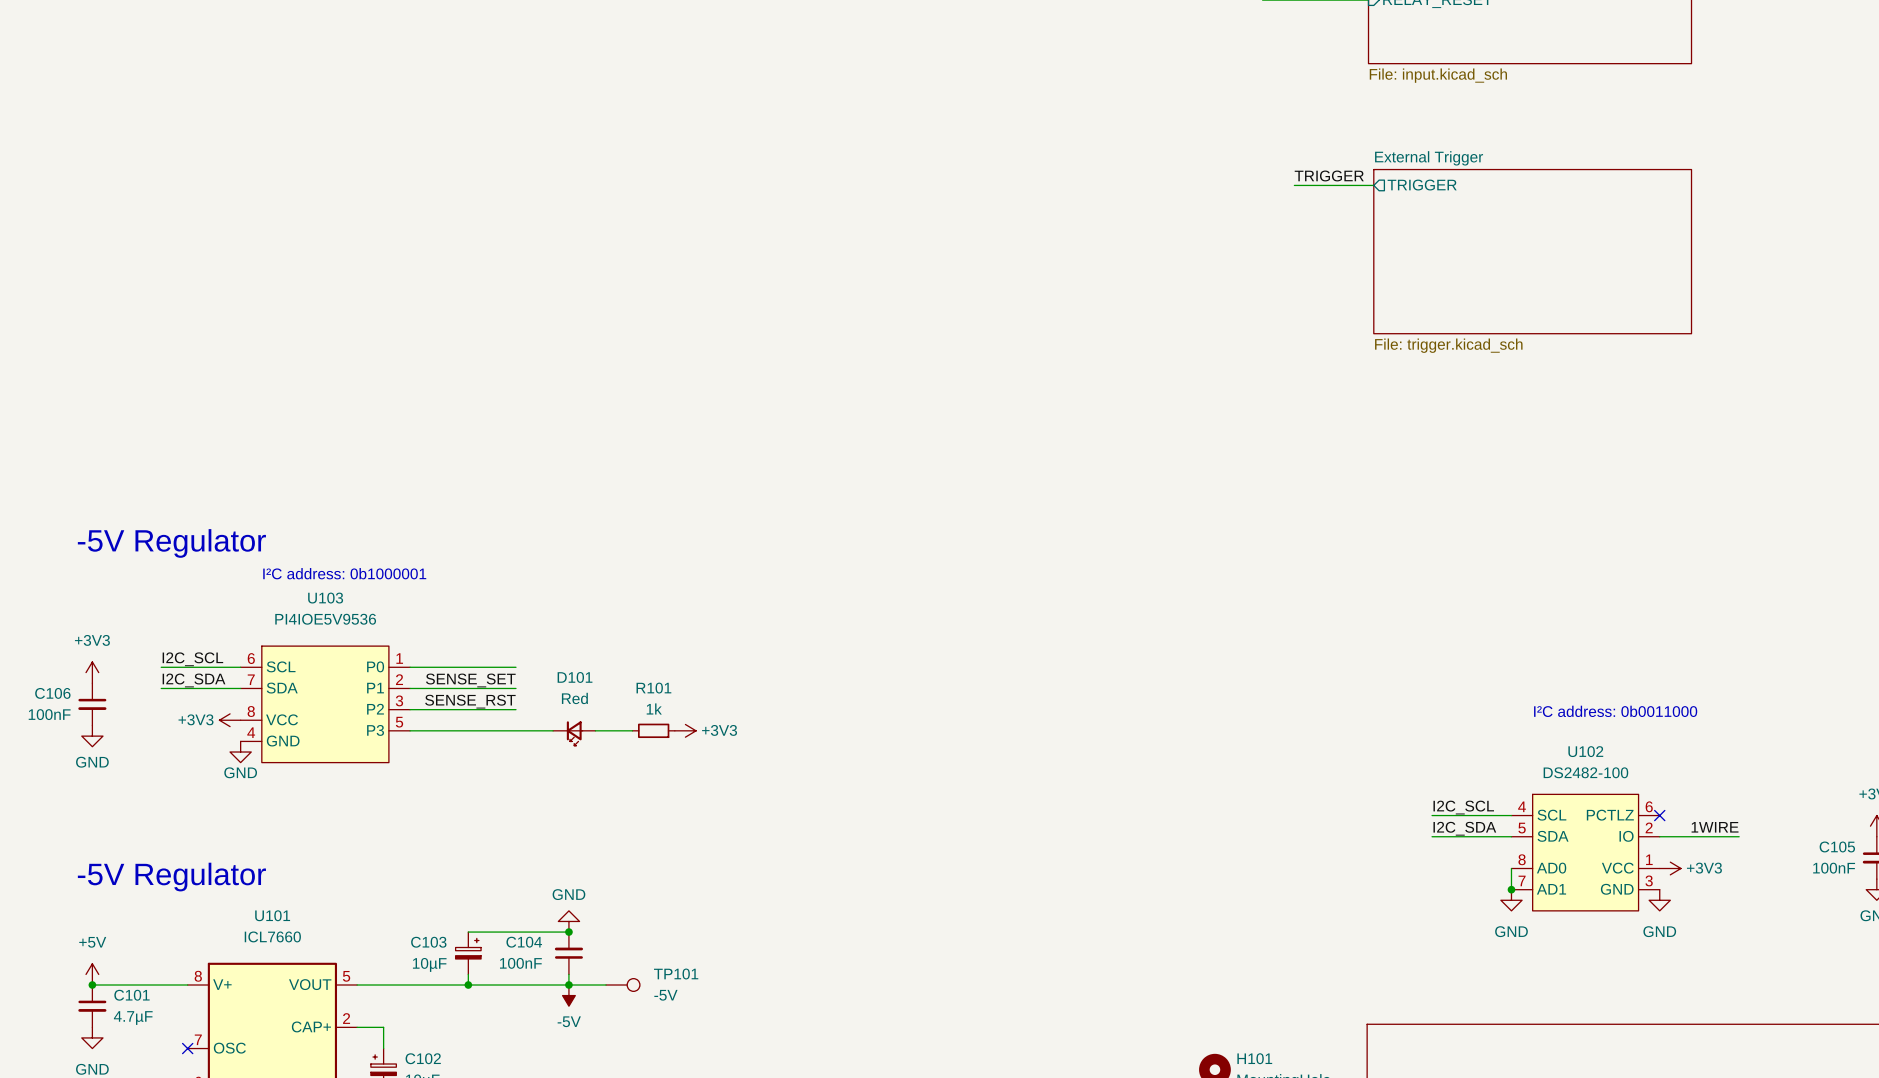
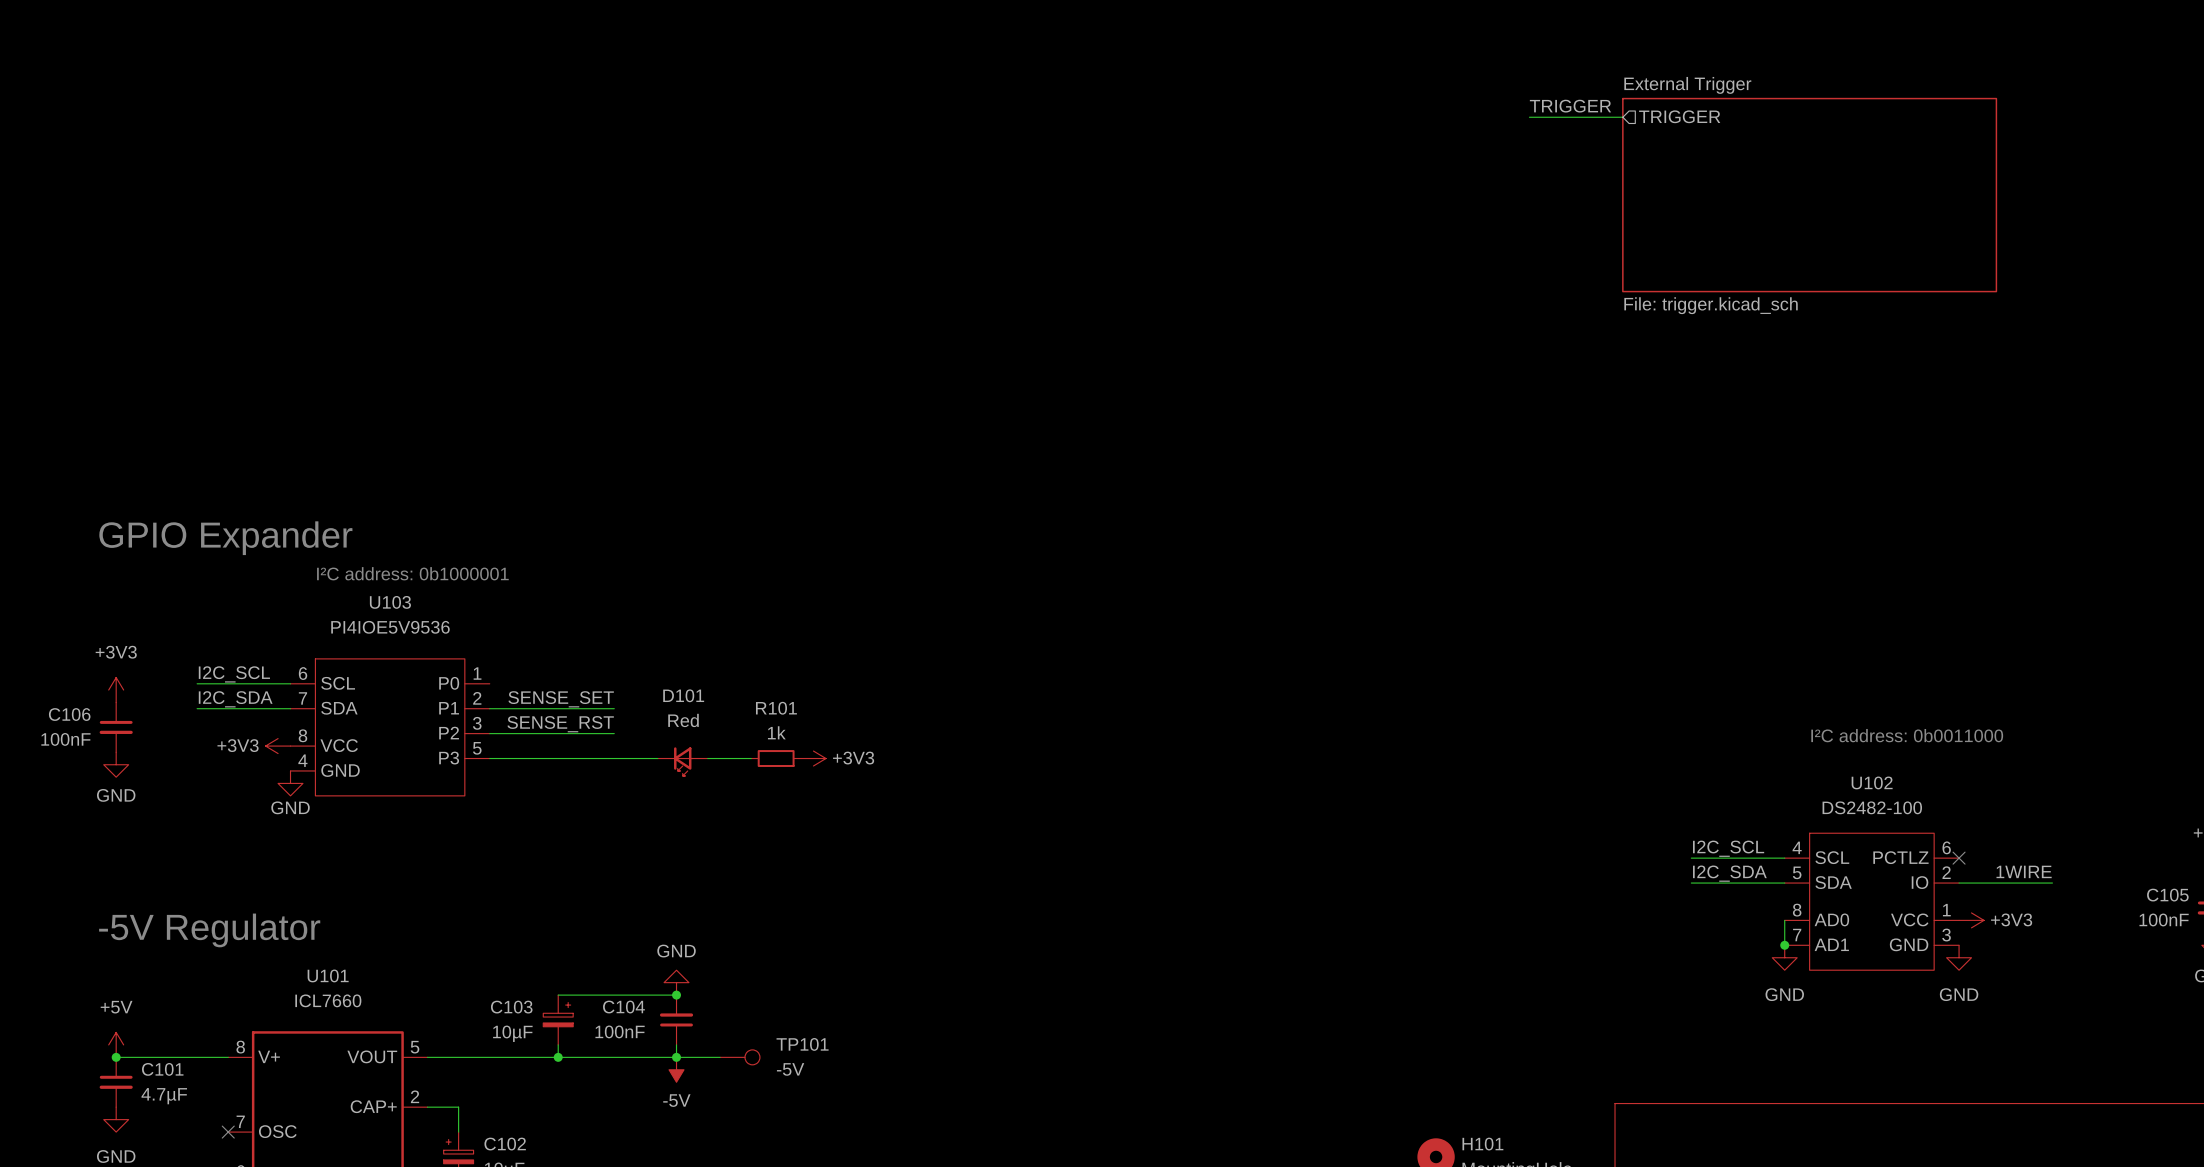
text: -5V Regulator (171, 543) -> GPIO Expander (225, 538)
wire: (410, 667) (515, 667) -> none

